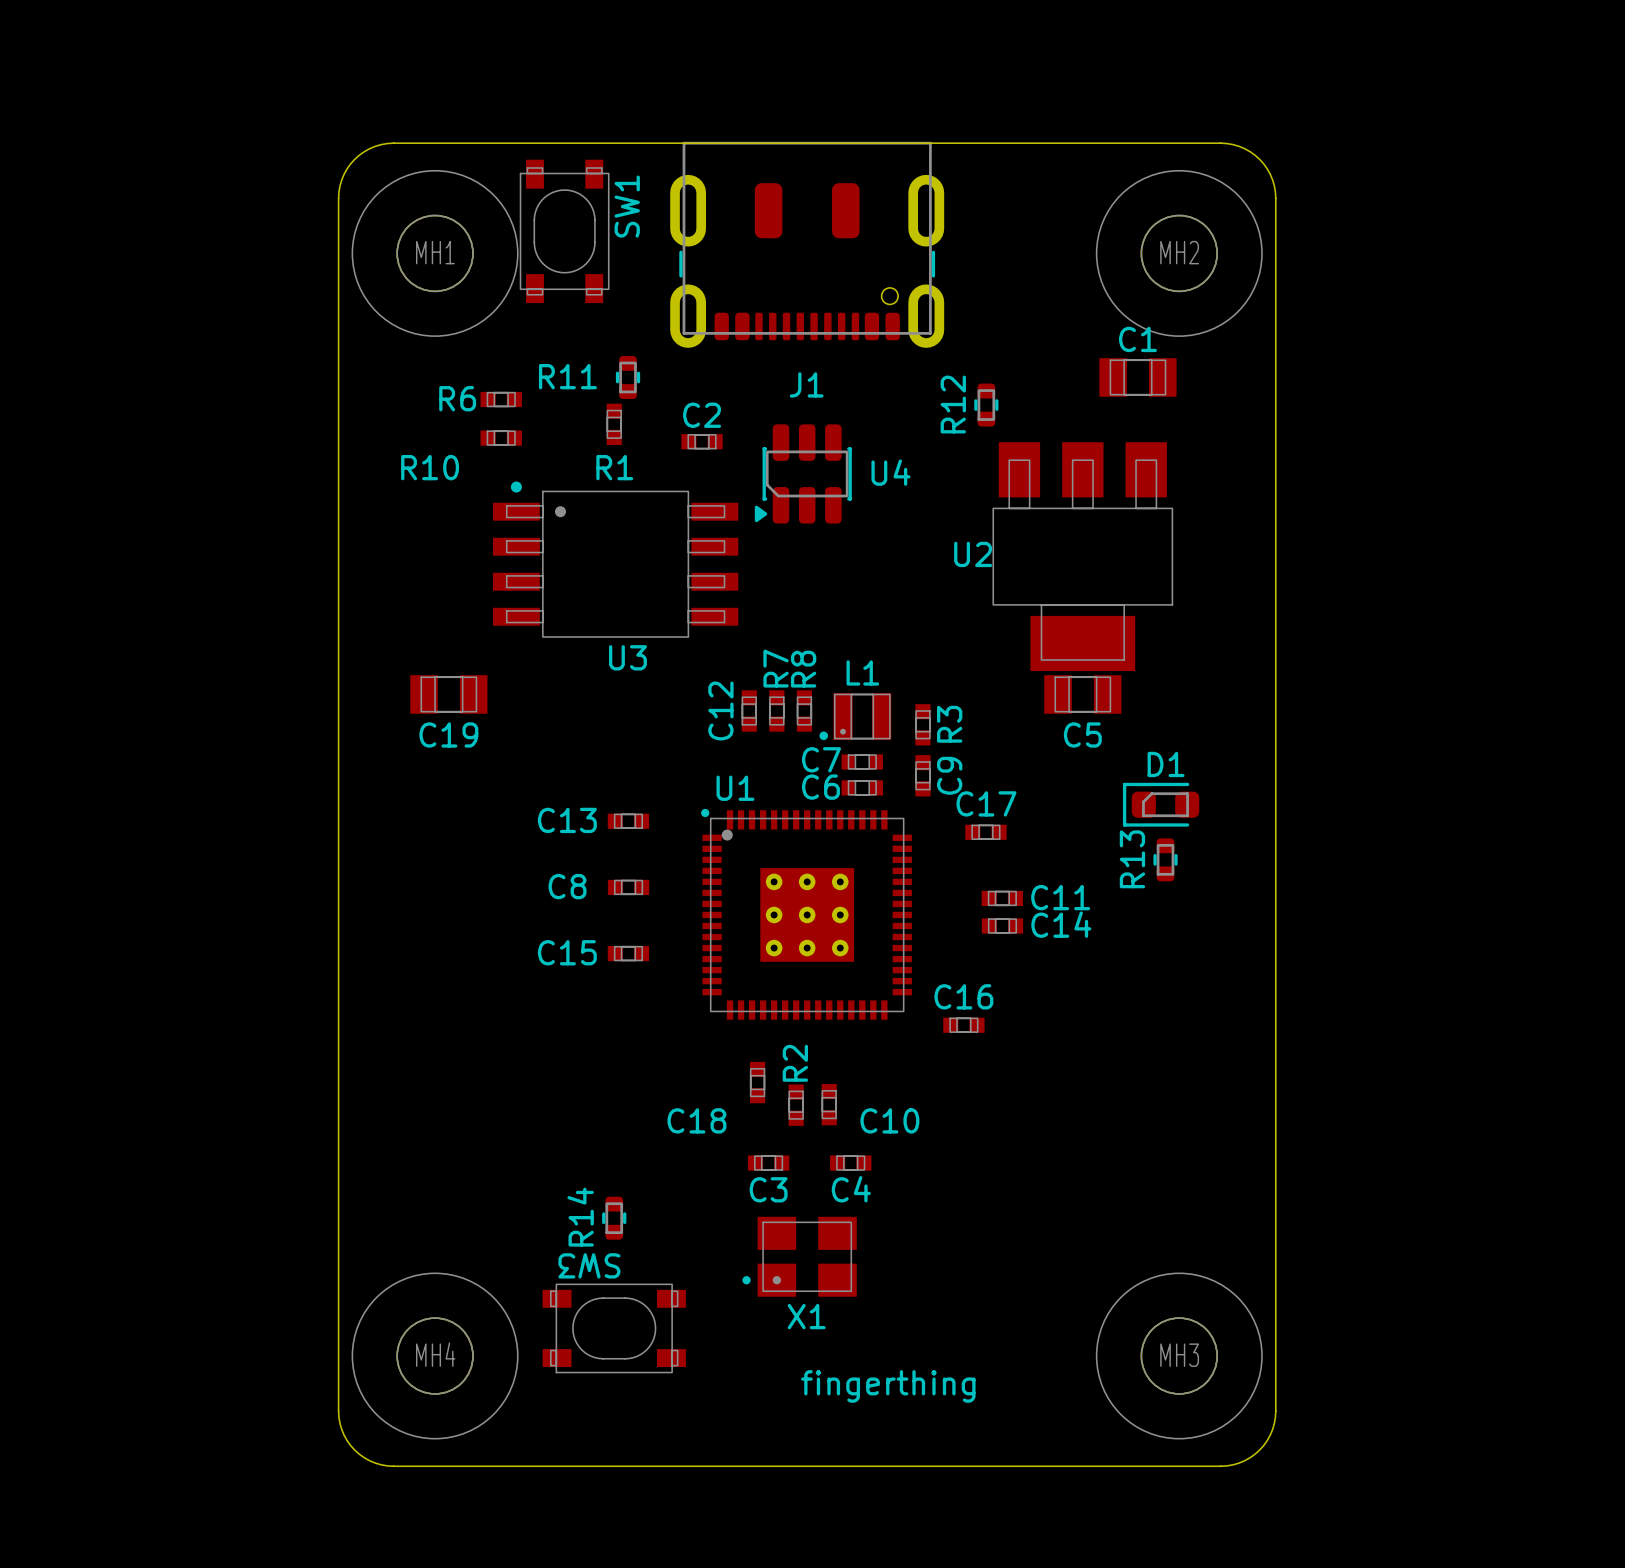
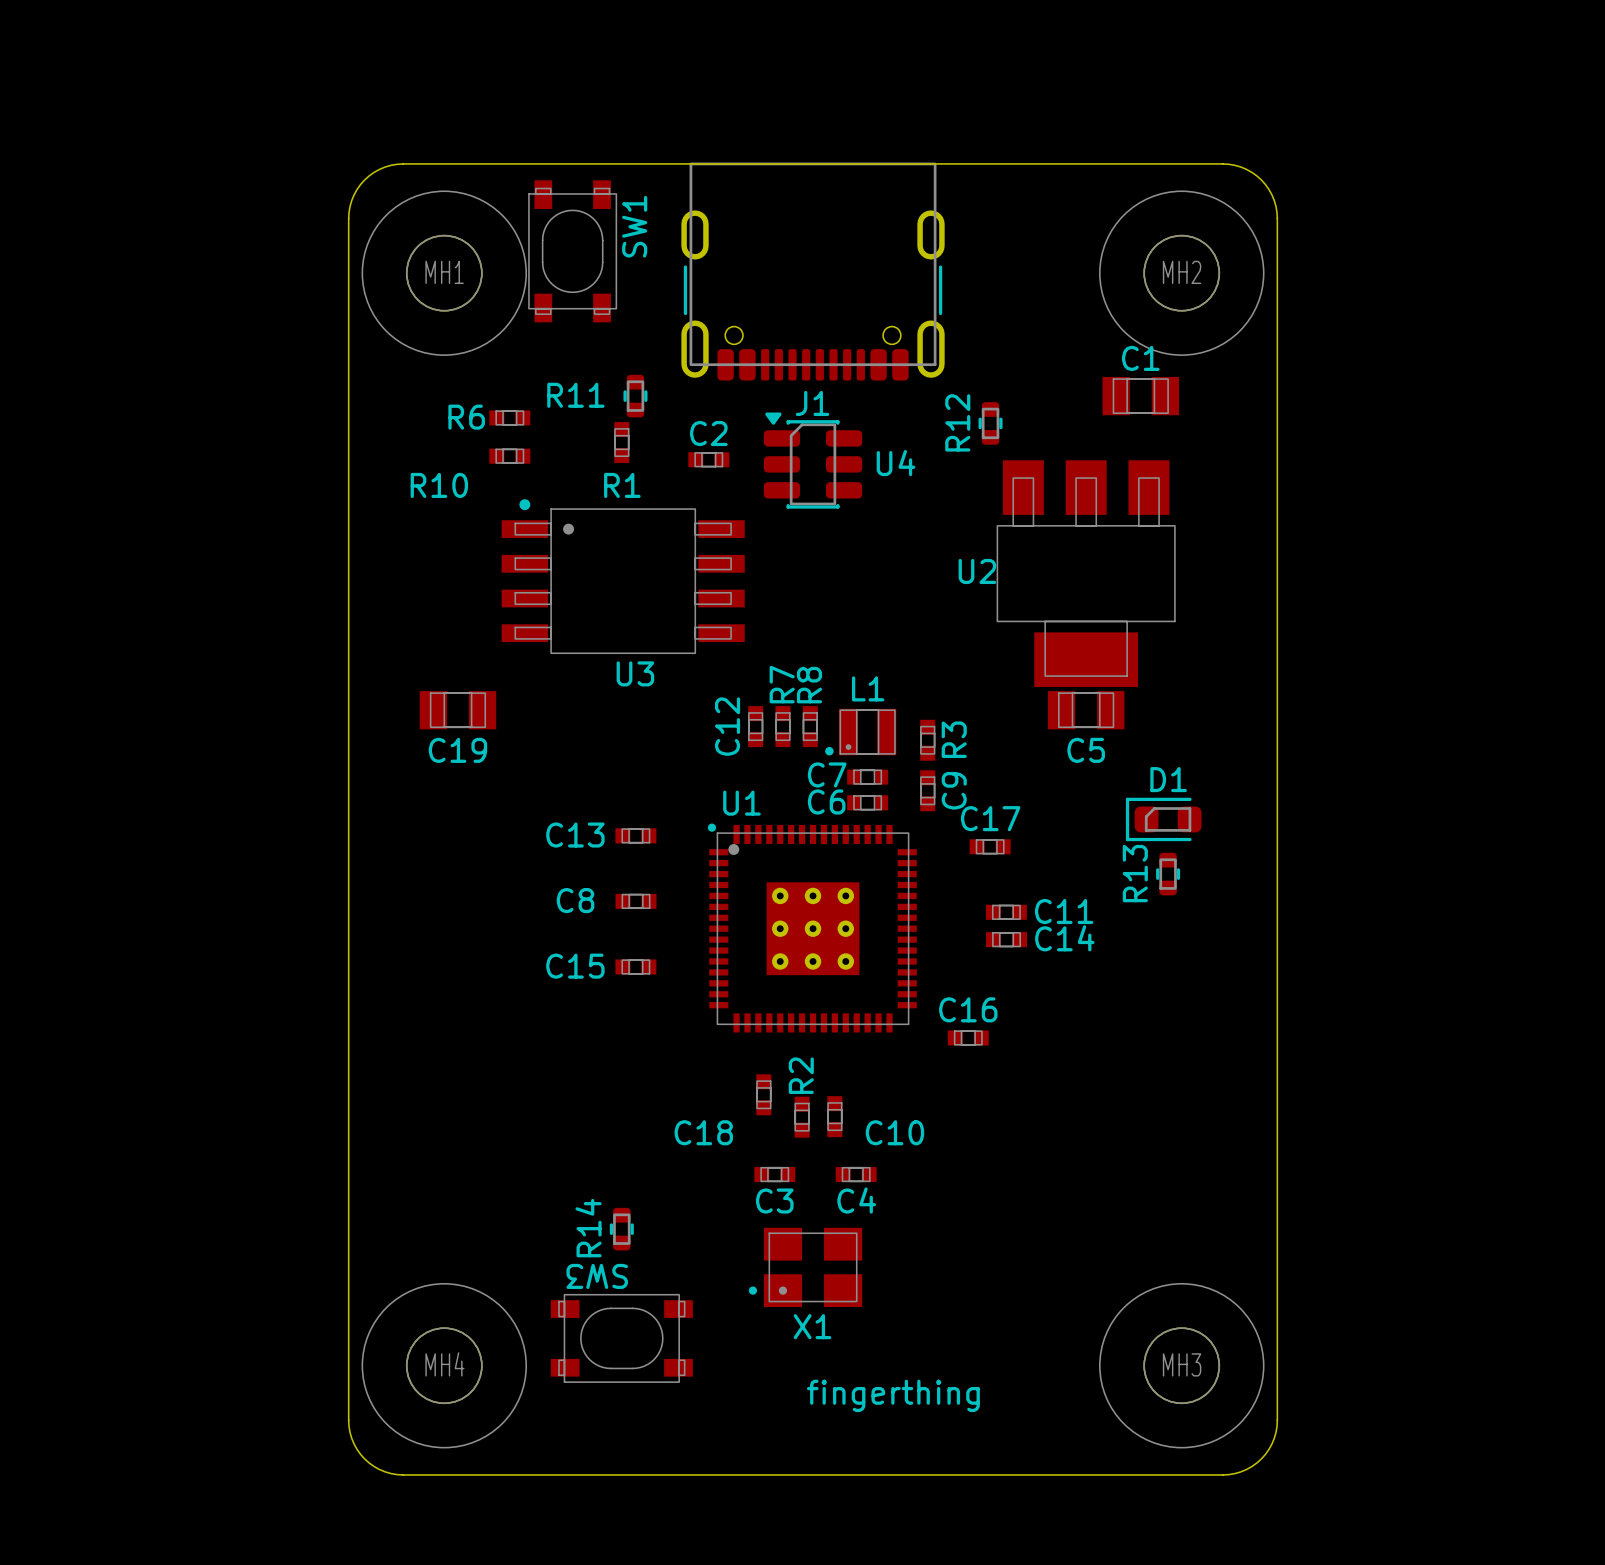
J1 footprint: [670, 141, 945, 348] -> [681, 162, 945, 381]
U4 rotation: 0° (803, 473) -> 90° clockwise (813, 460)

